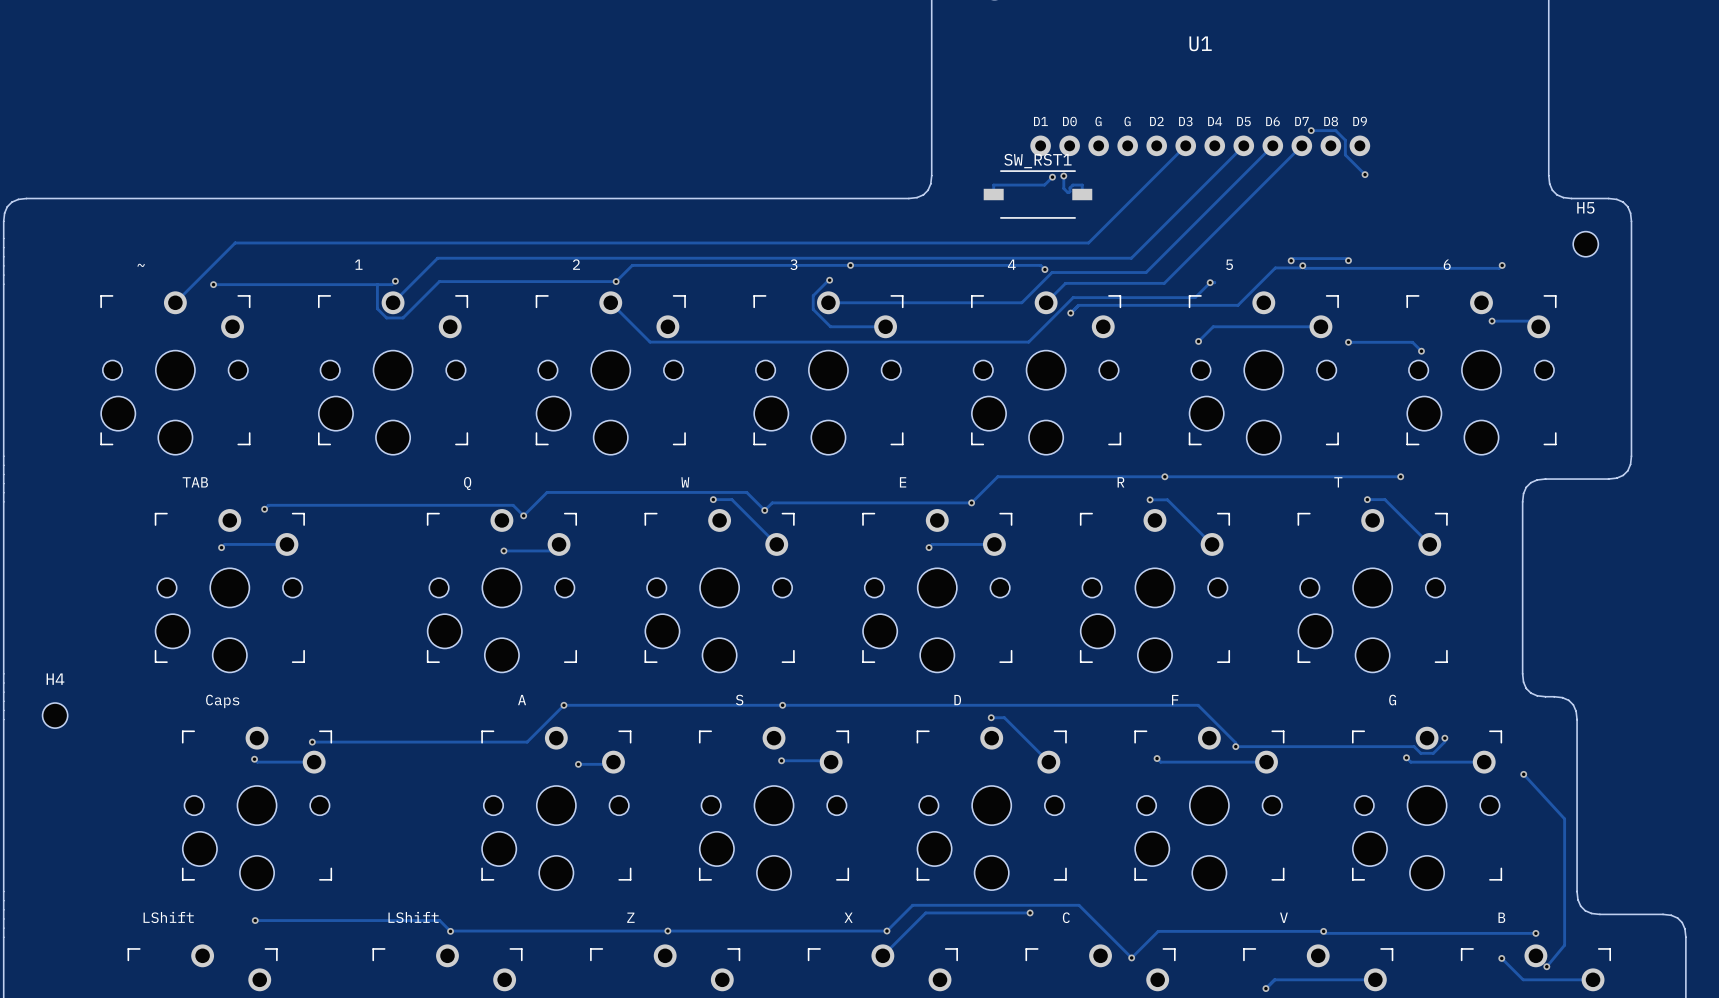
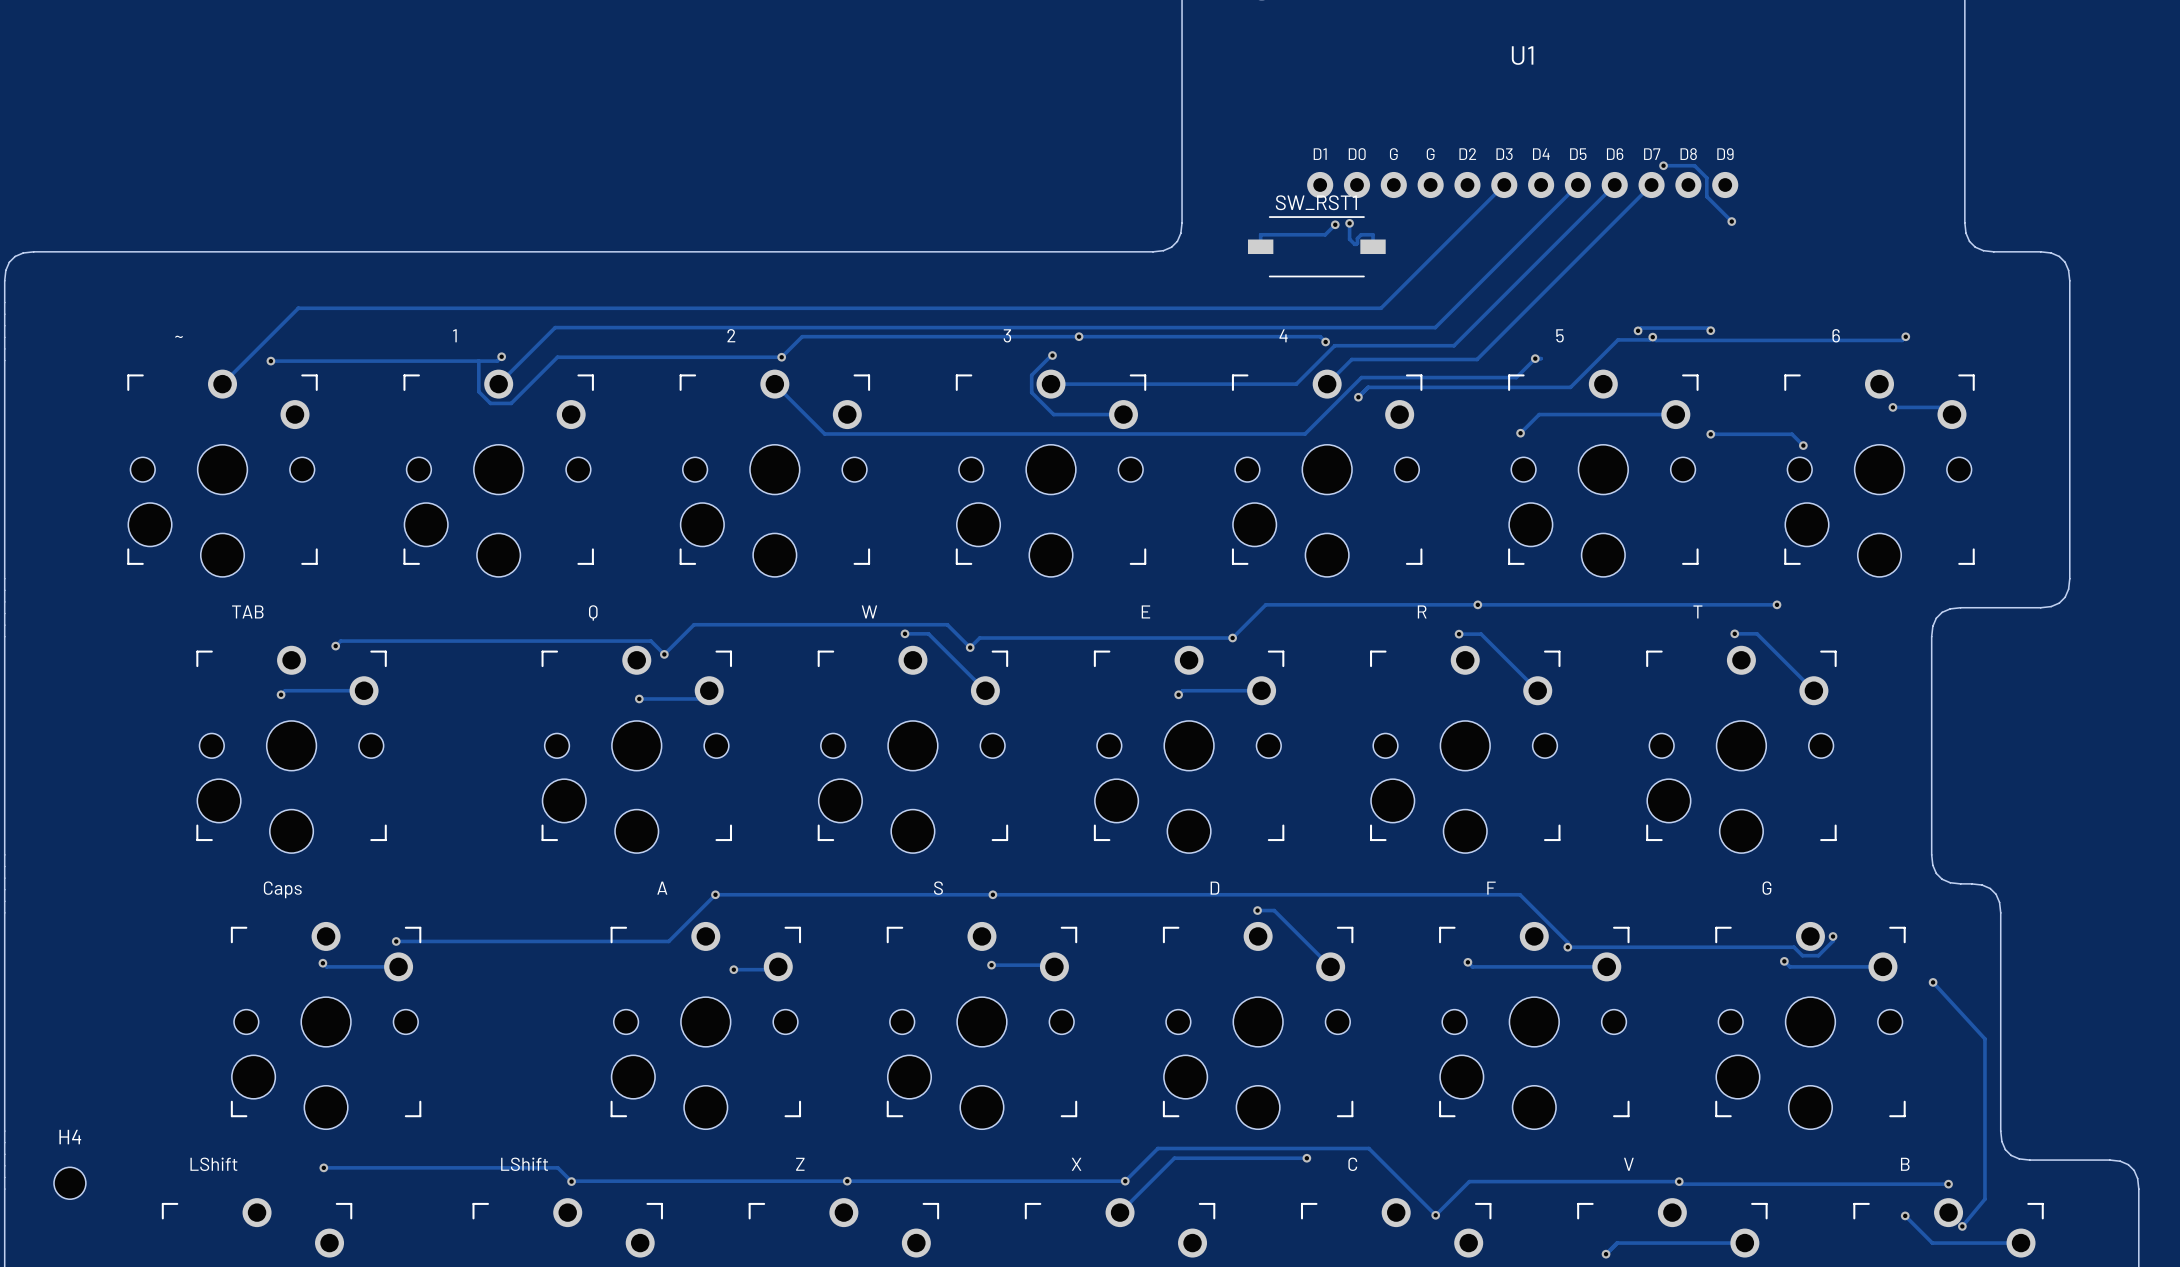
H5: (1585, 244) -> none
H4 position: (55, 715) -> (69, 1183)

